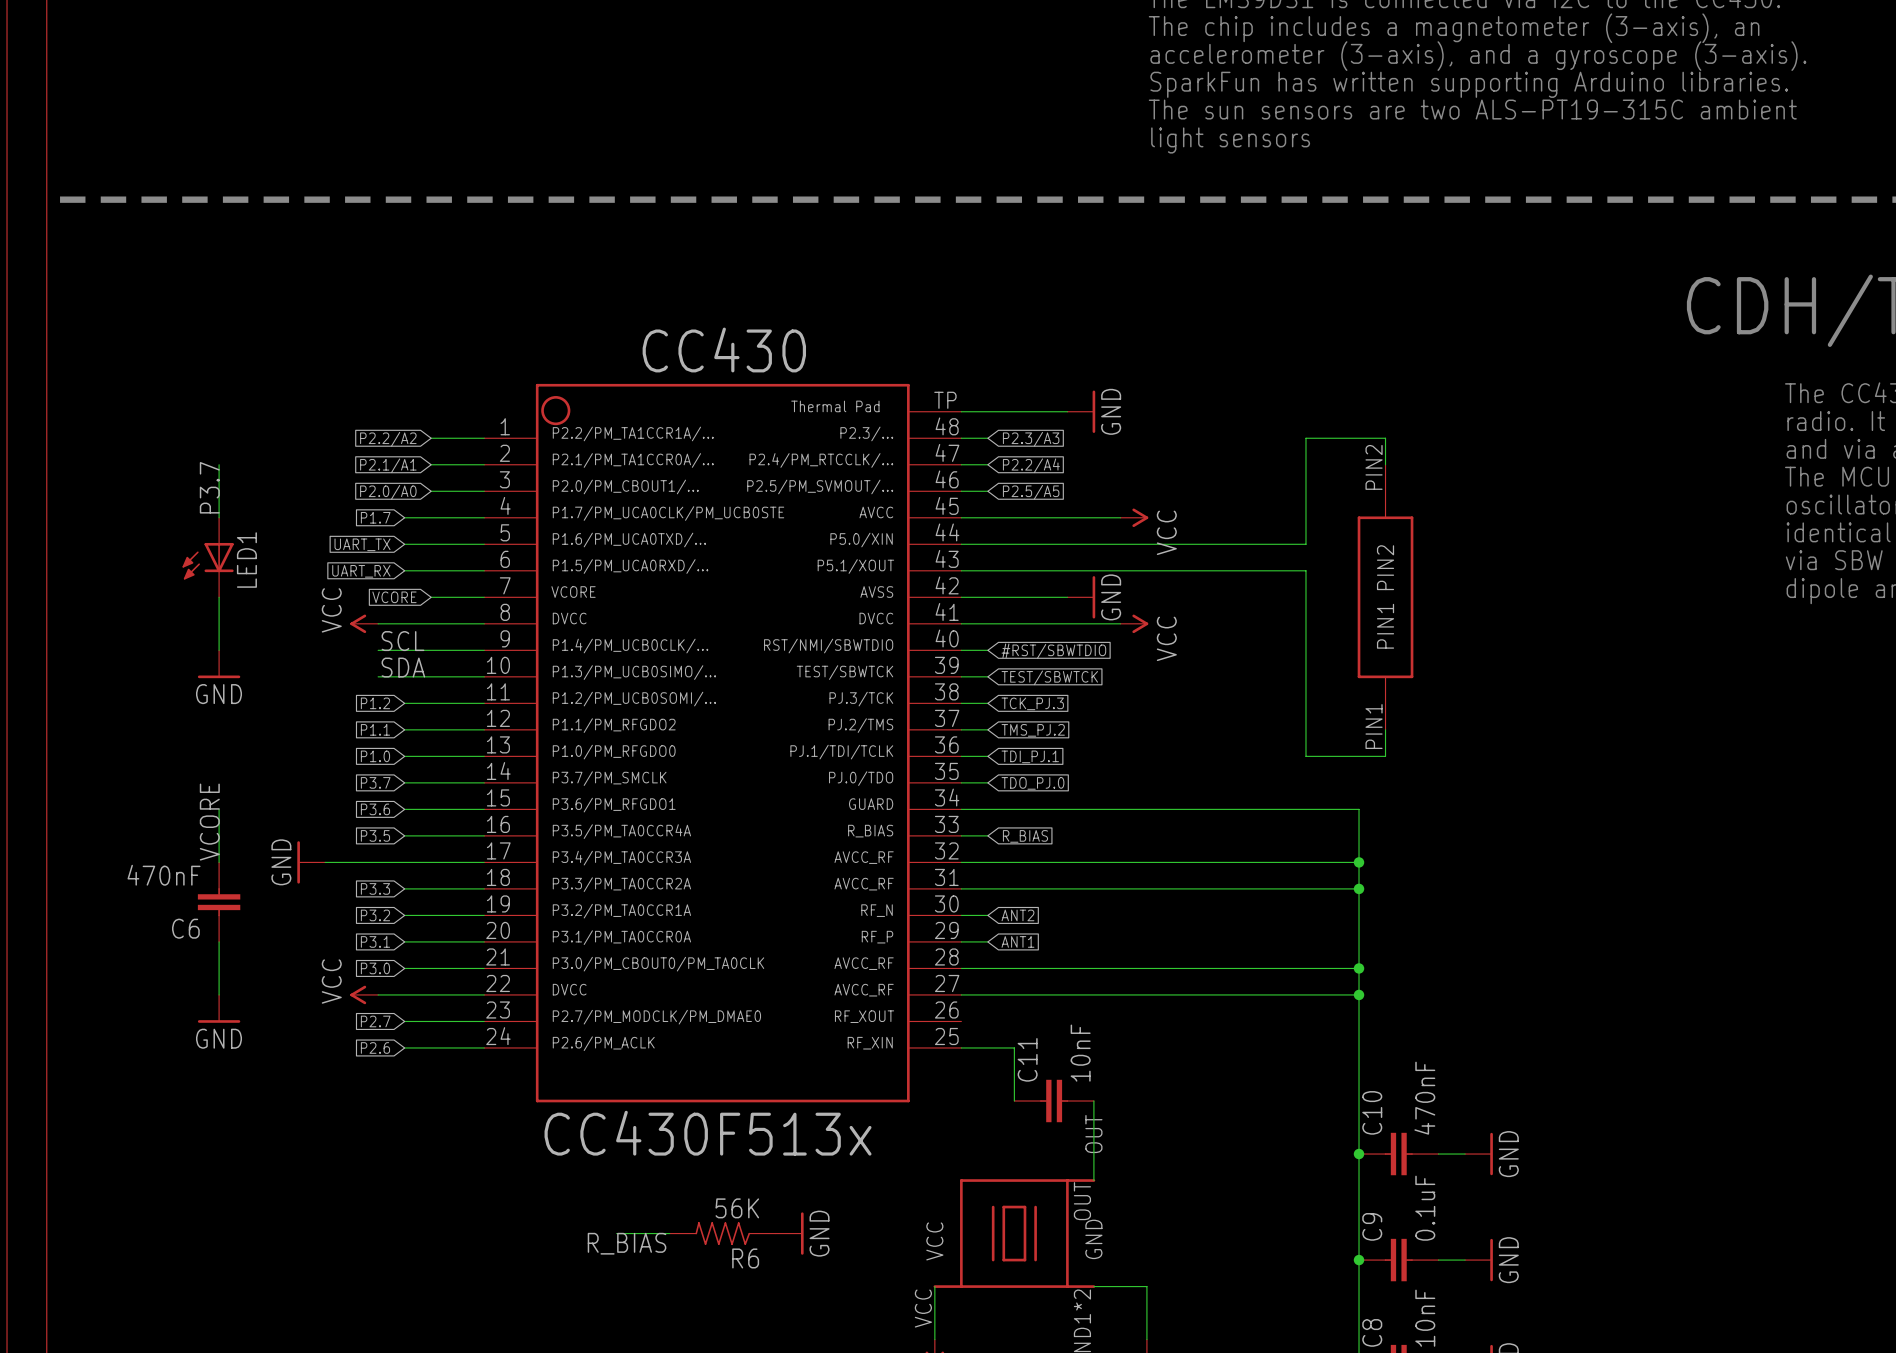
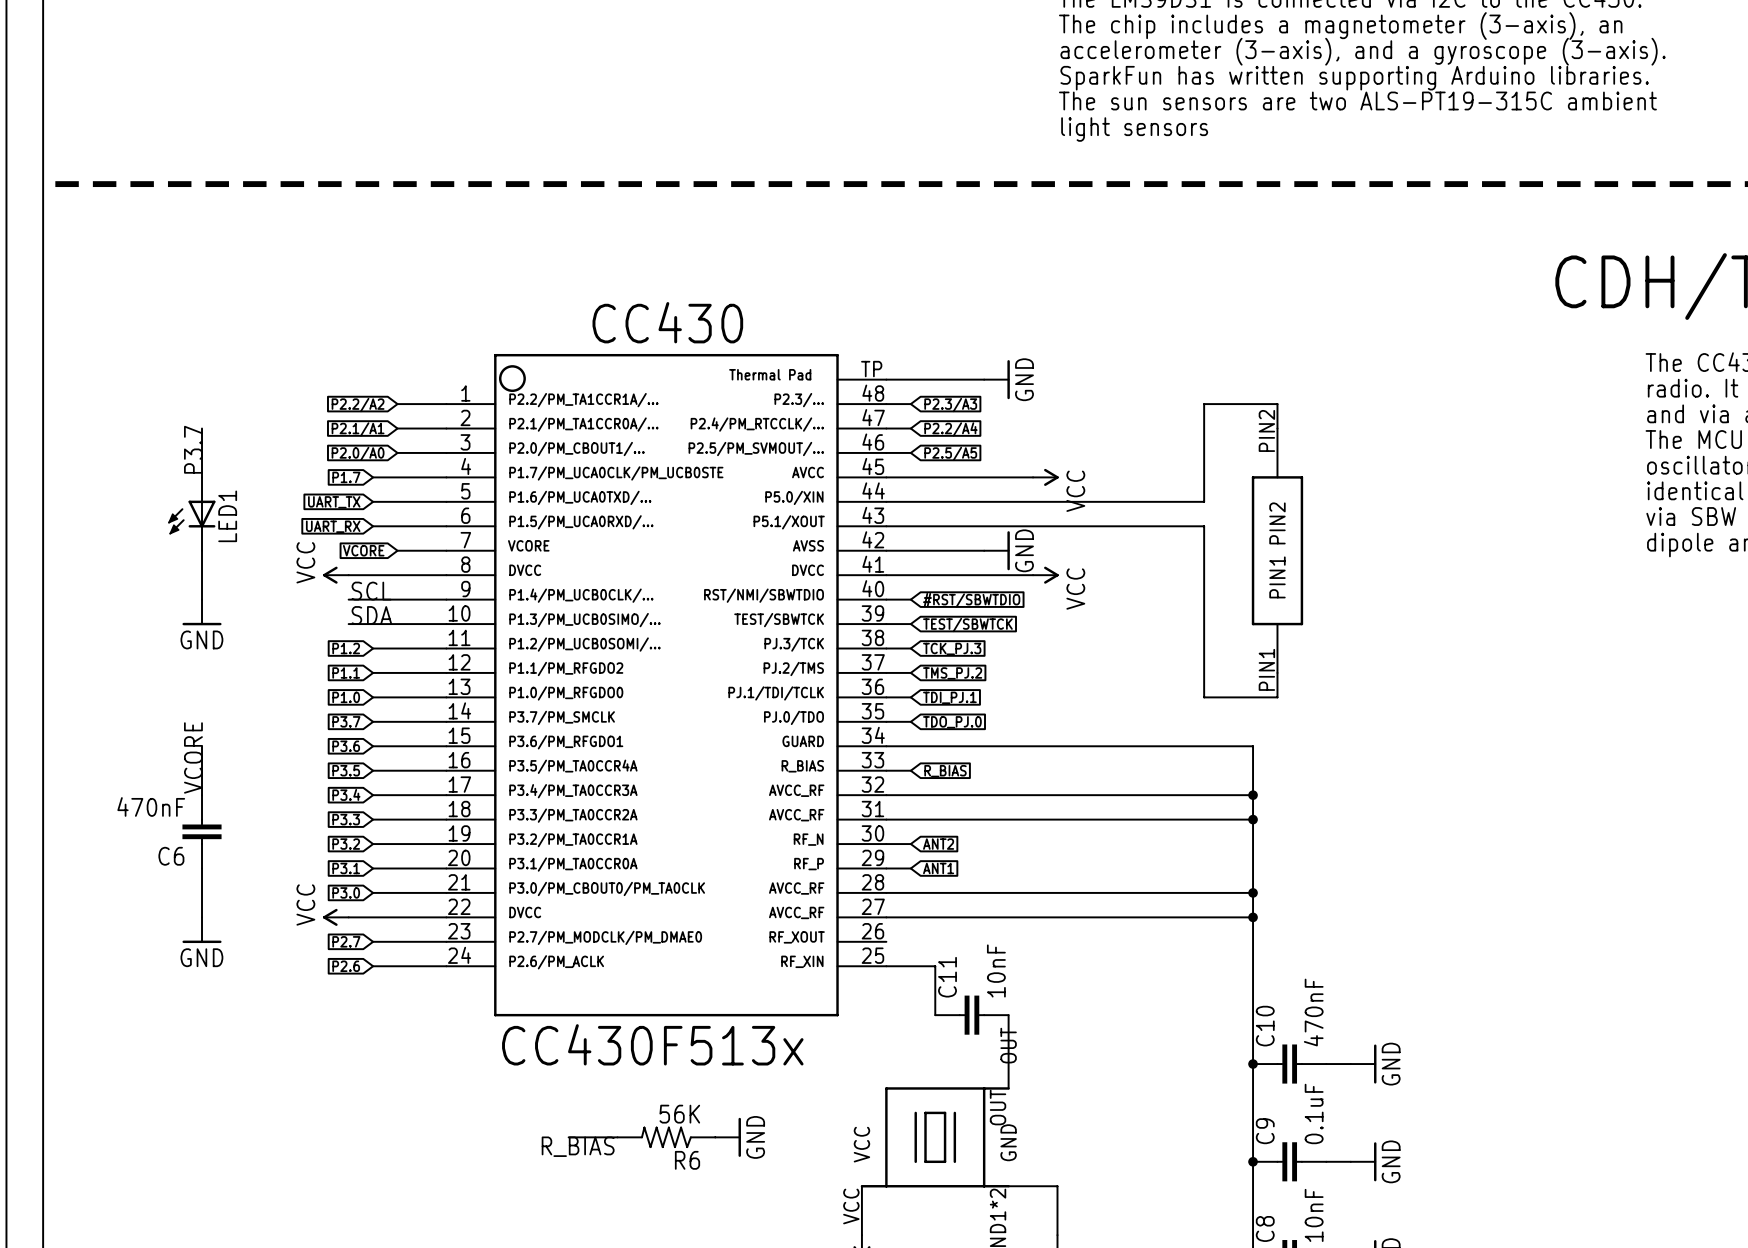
power symbol: GND (311, 862) -> none
wire: (325, 862) (404, 862) -> none
global label: none -> P3.4 (346, 794)

